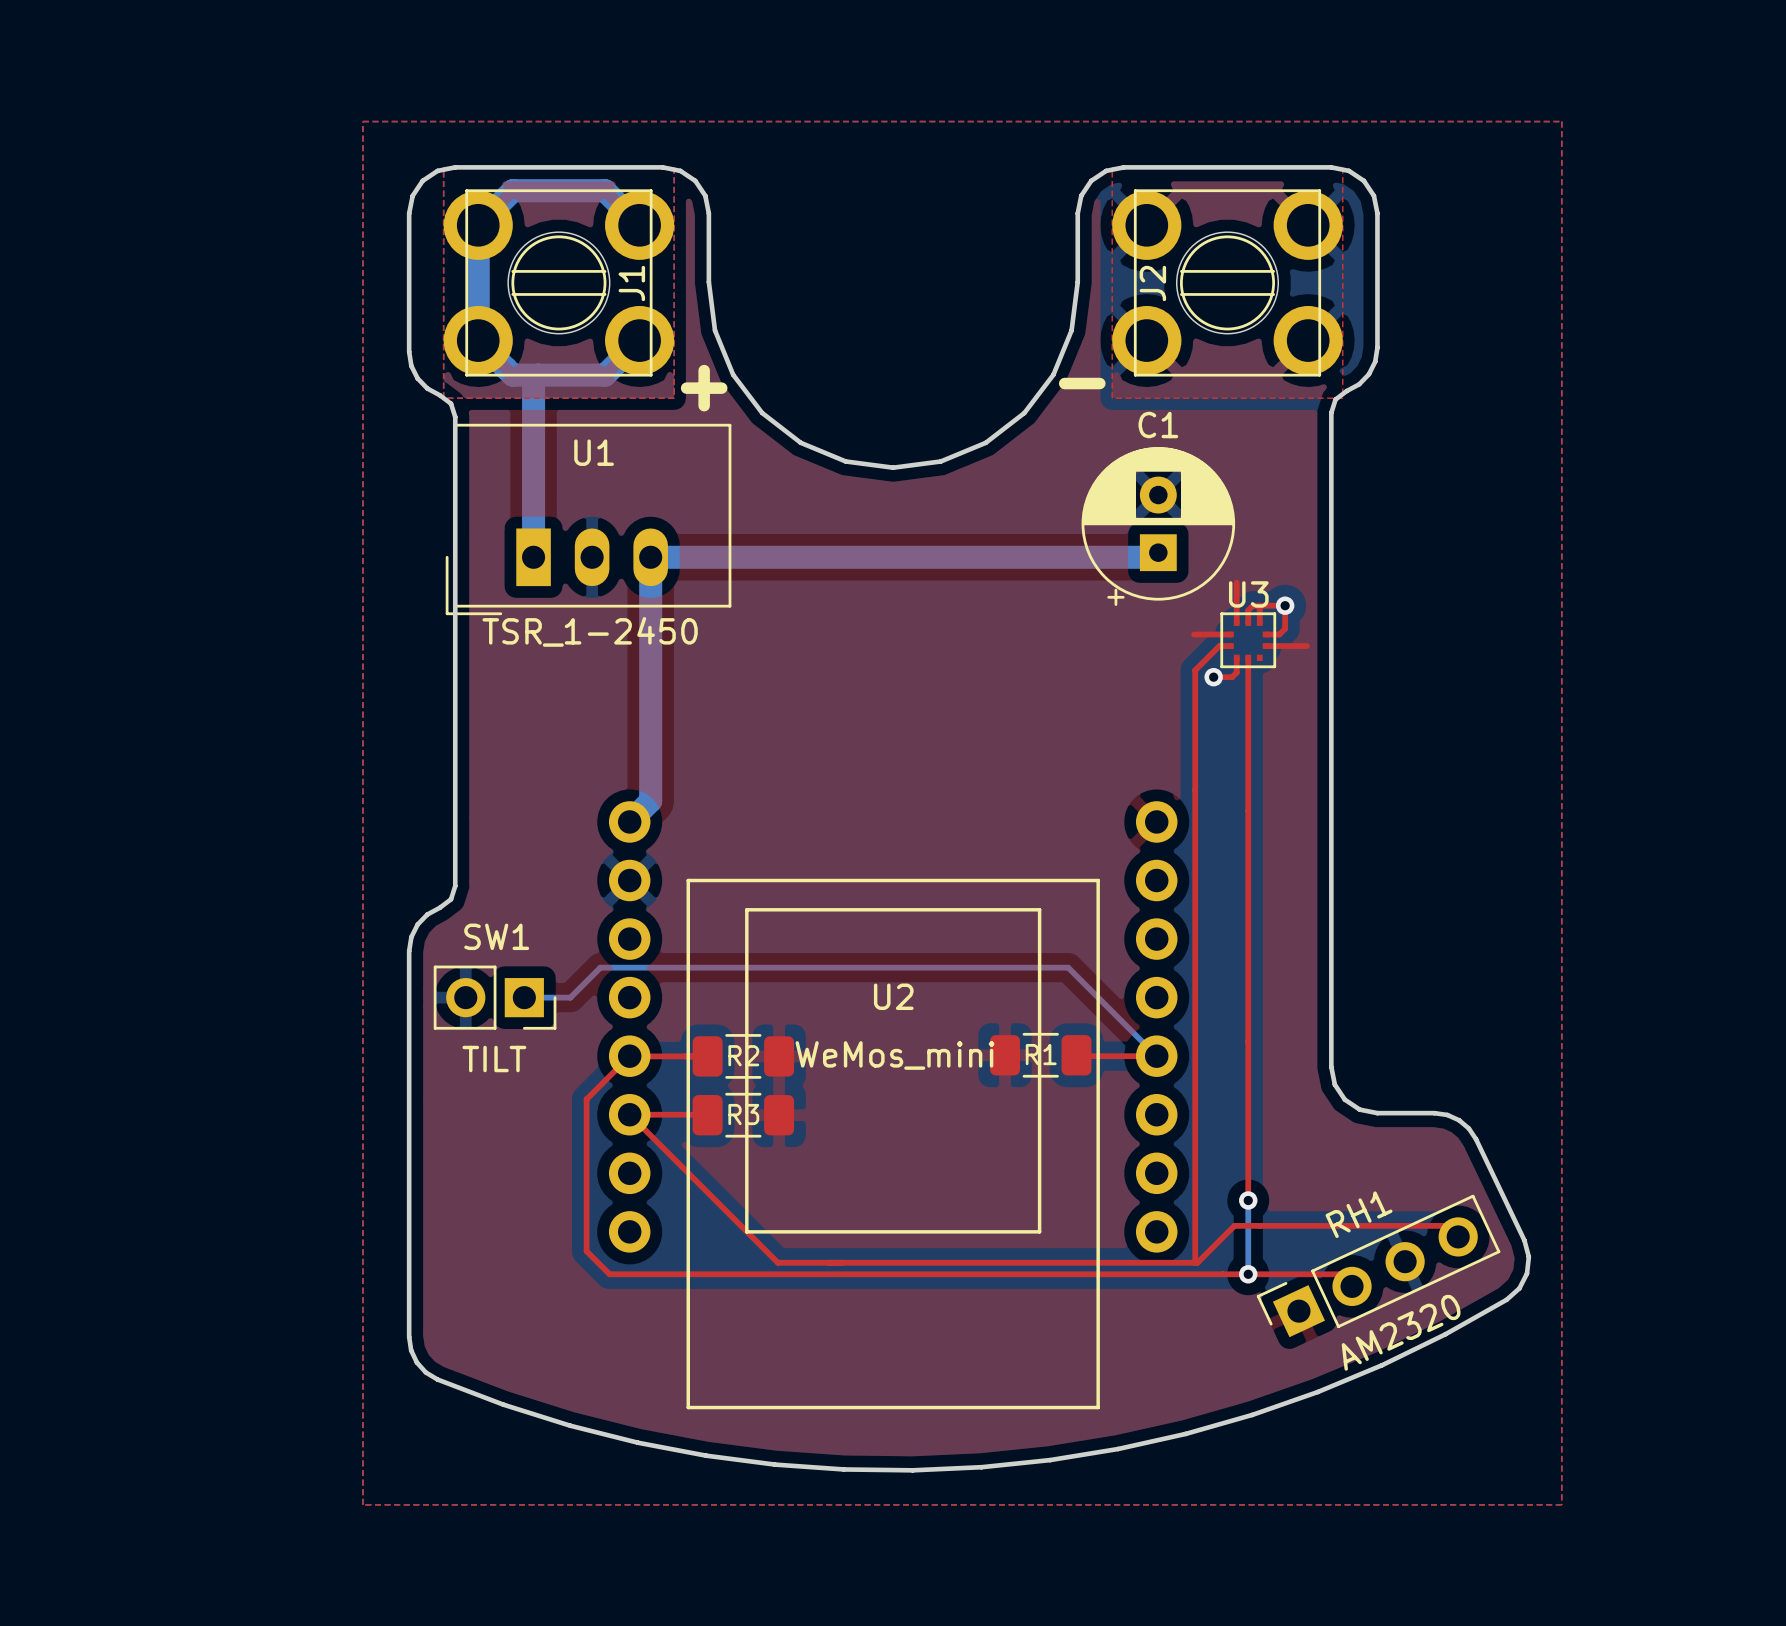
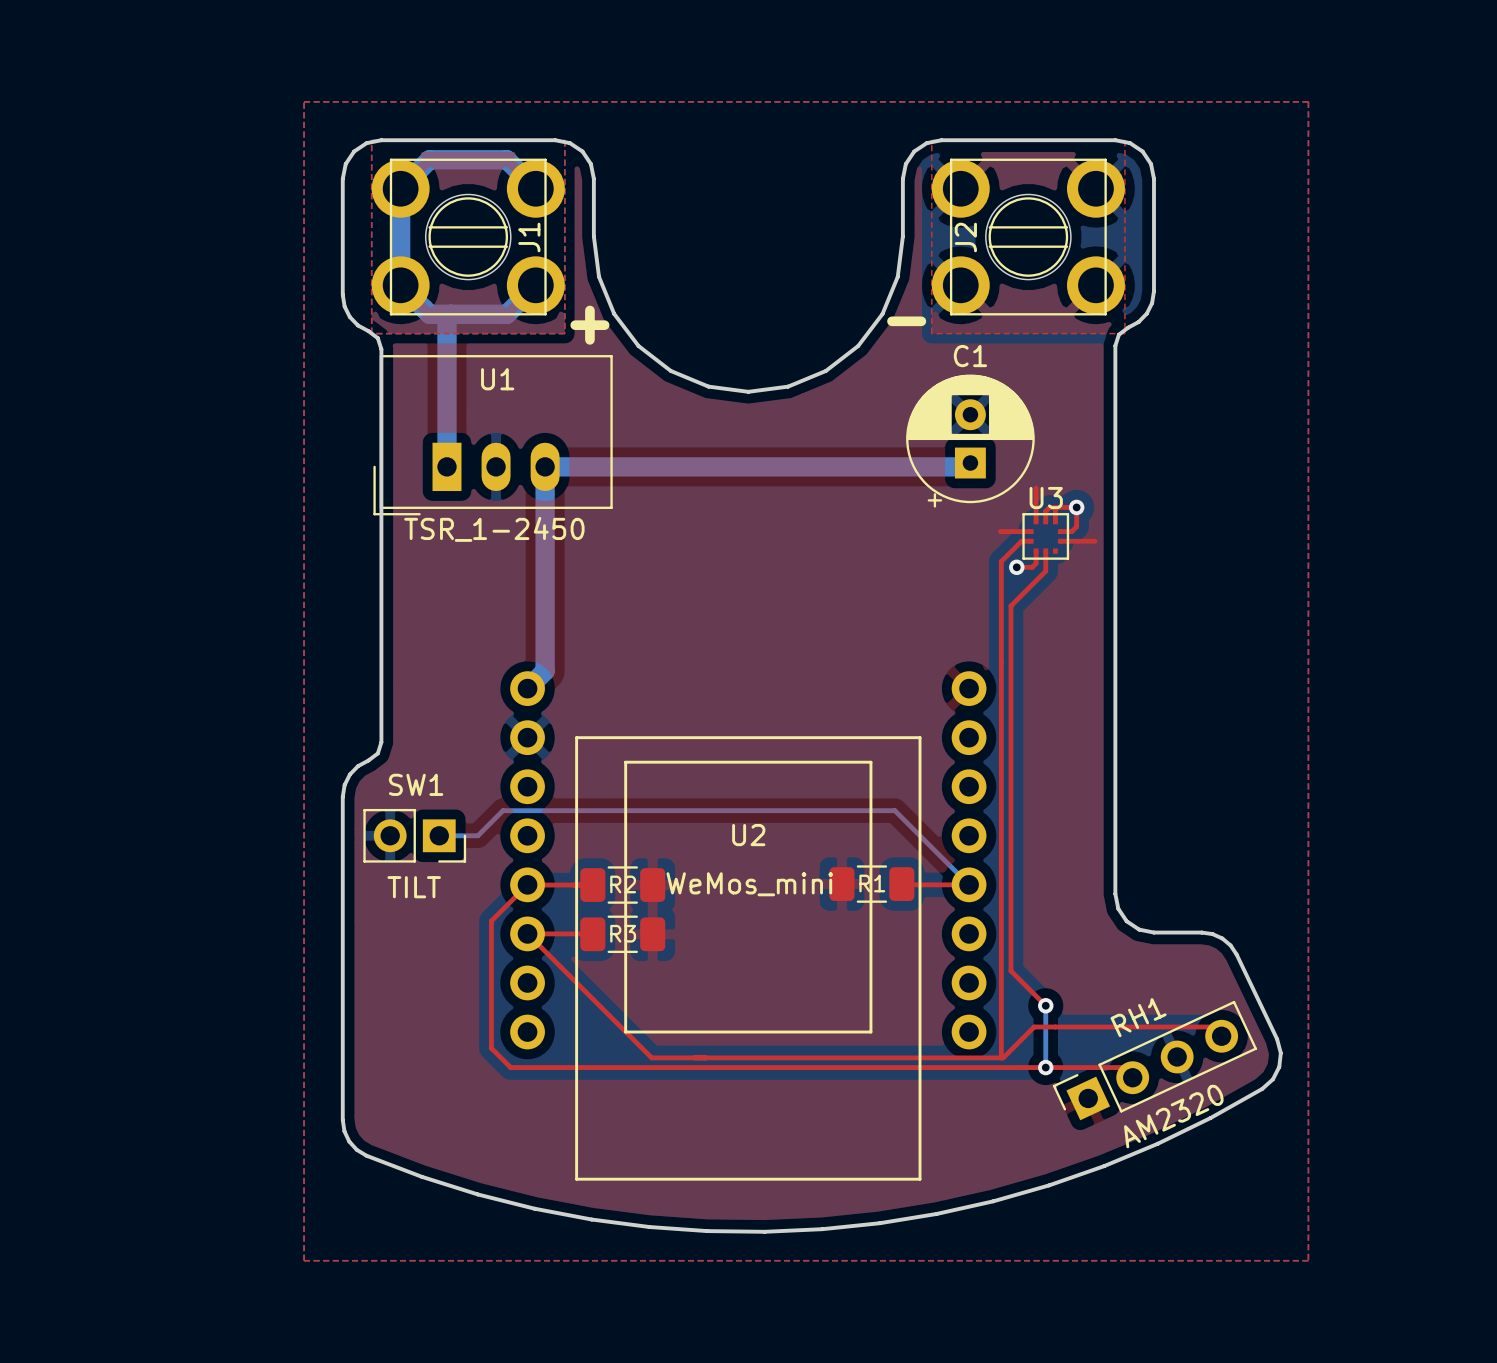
top track: (1248, 681) (1248, 1200) -> (1045, 571) (1010, 605) (1010, 970) (1045, 1005)

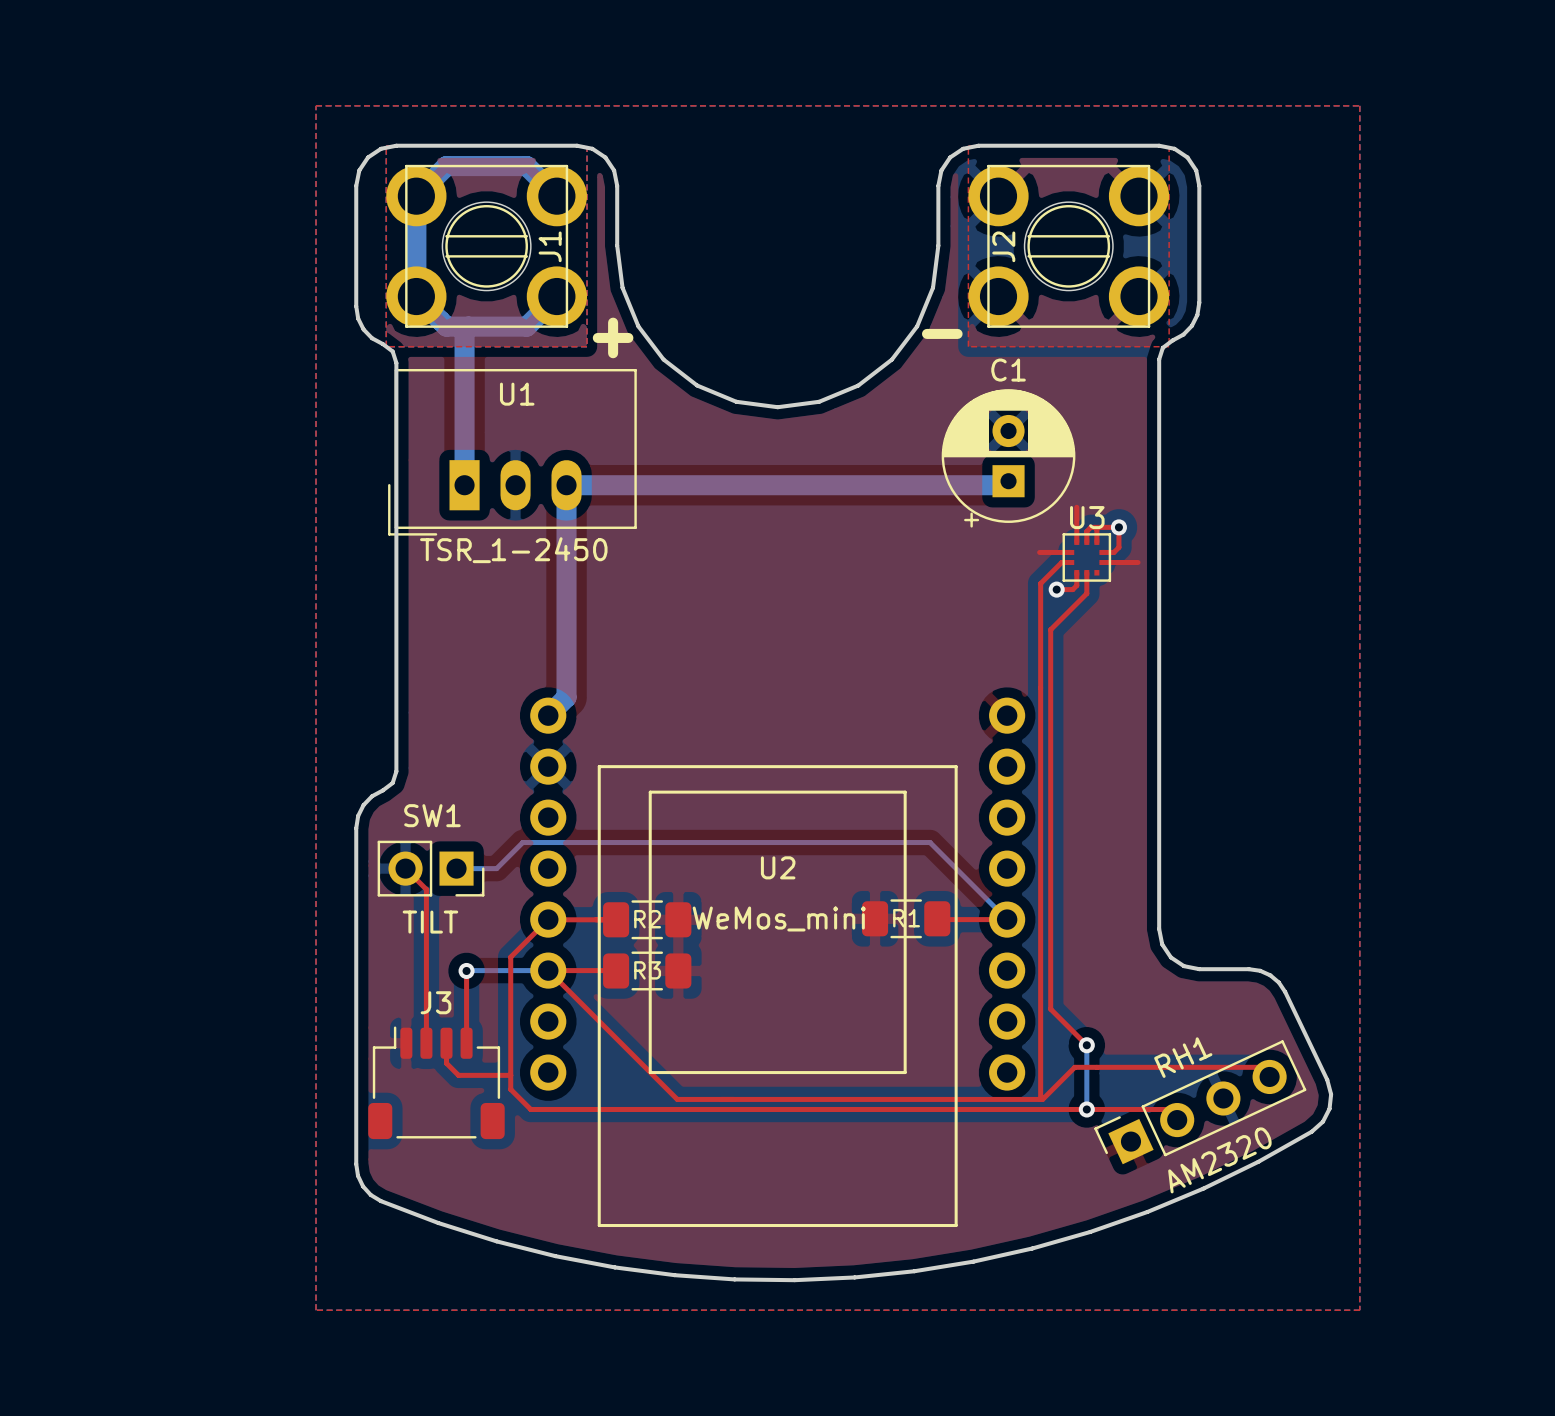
top track: none -> (405, 868) (426, 889) (426, 1043)
bottom track: none -> (548, 970) (466, 970)
top track: none -> (466, 970) (466, 1043)
via: none -> (466, 970)
top track: none -> (446, 1043) (446, 1063) (458, 1075) (510, 1075)
J3: none -> (436, 1082)

